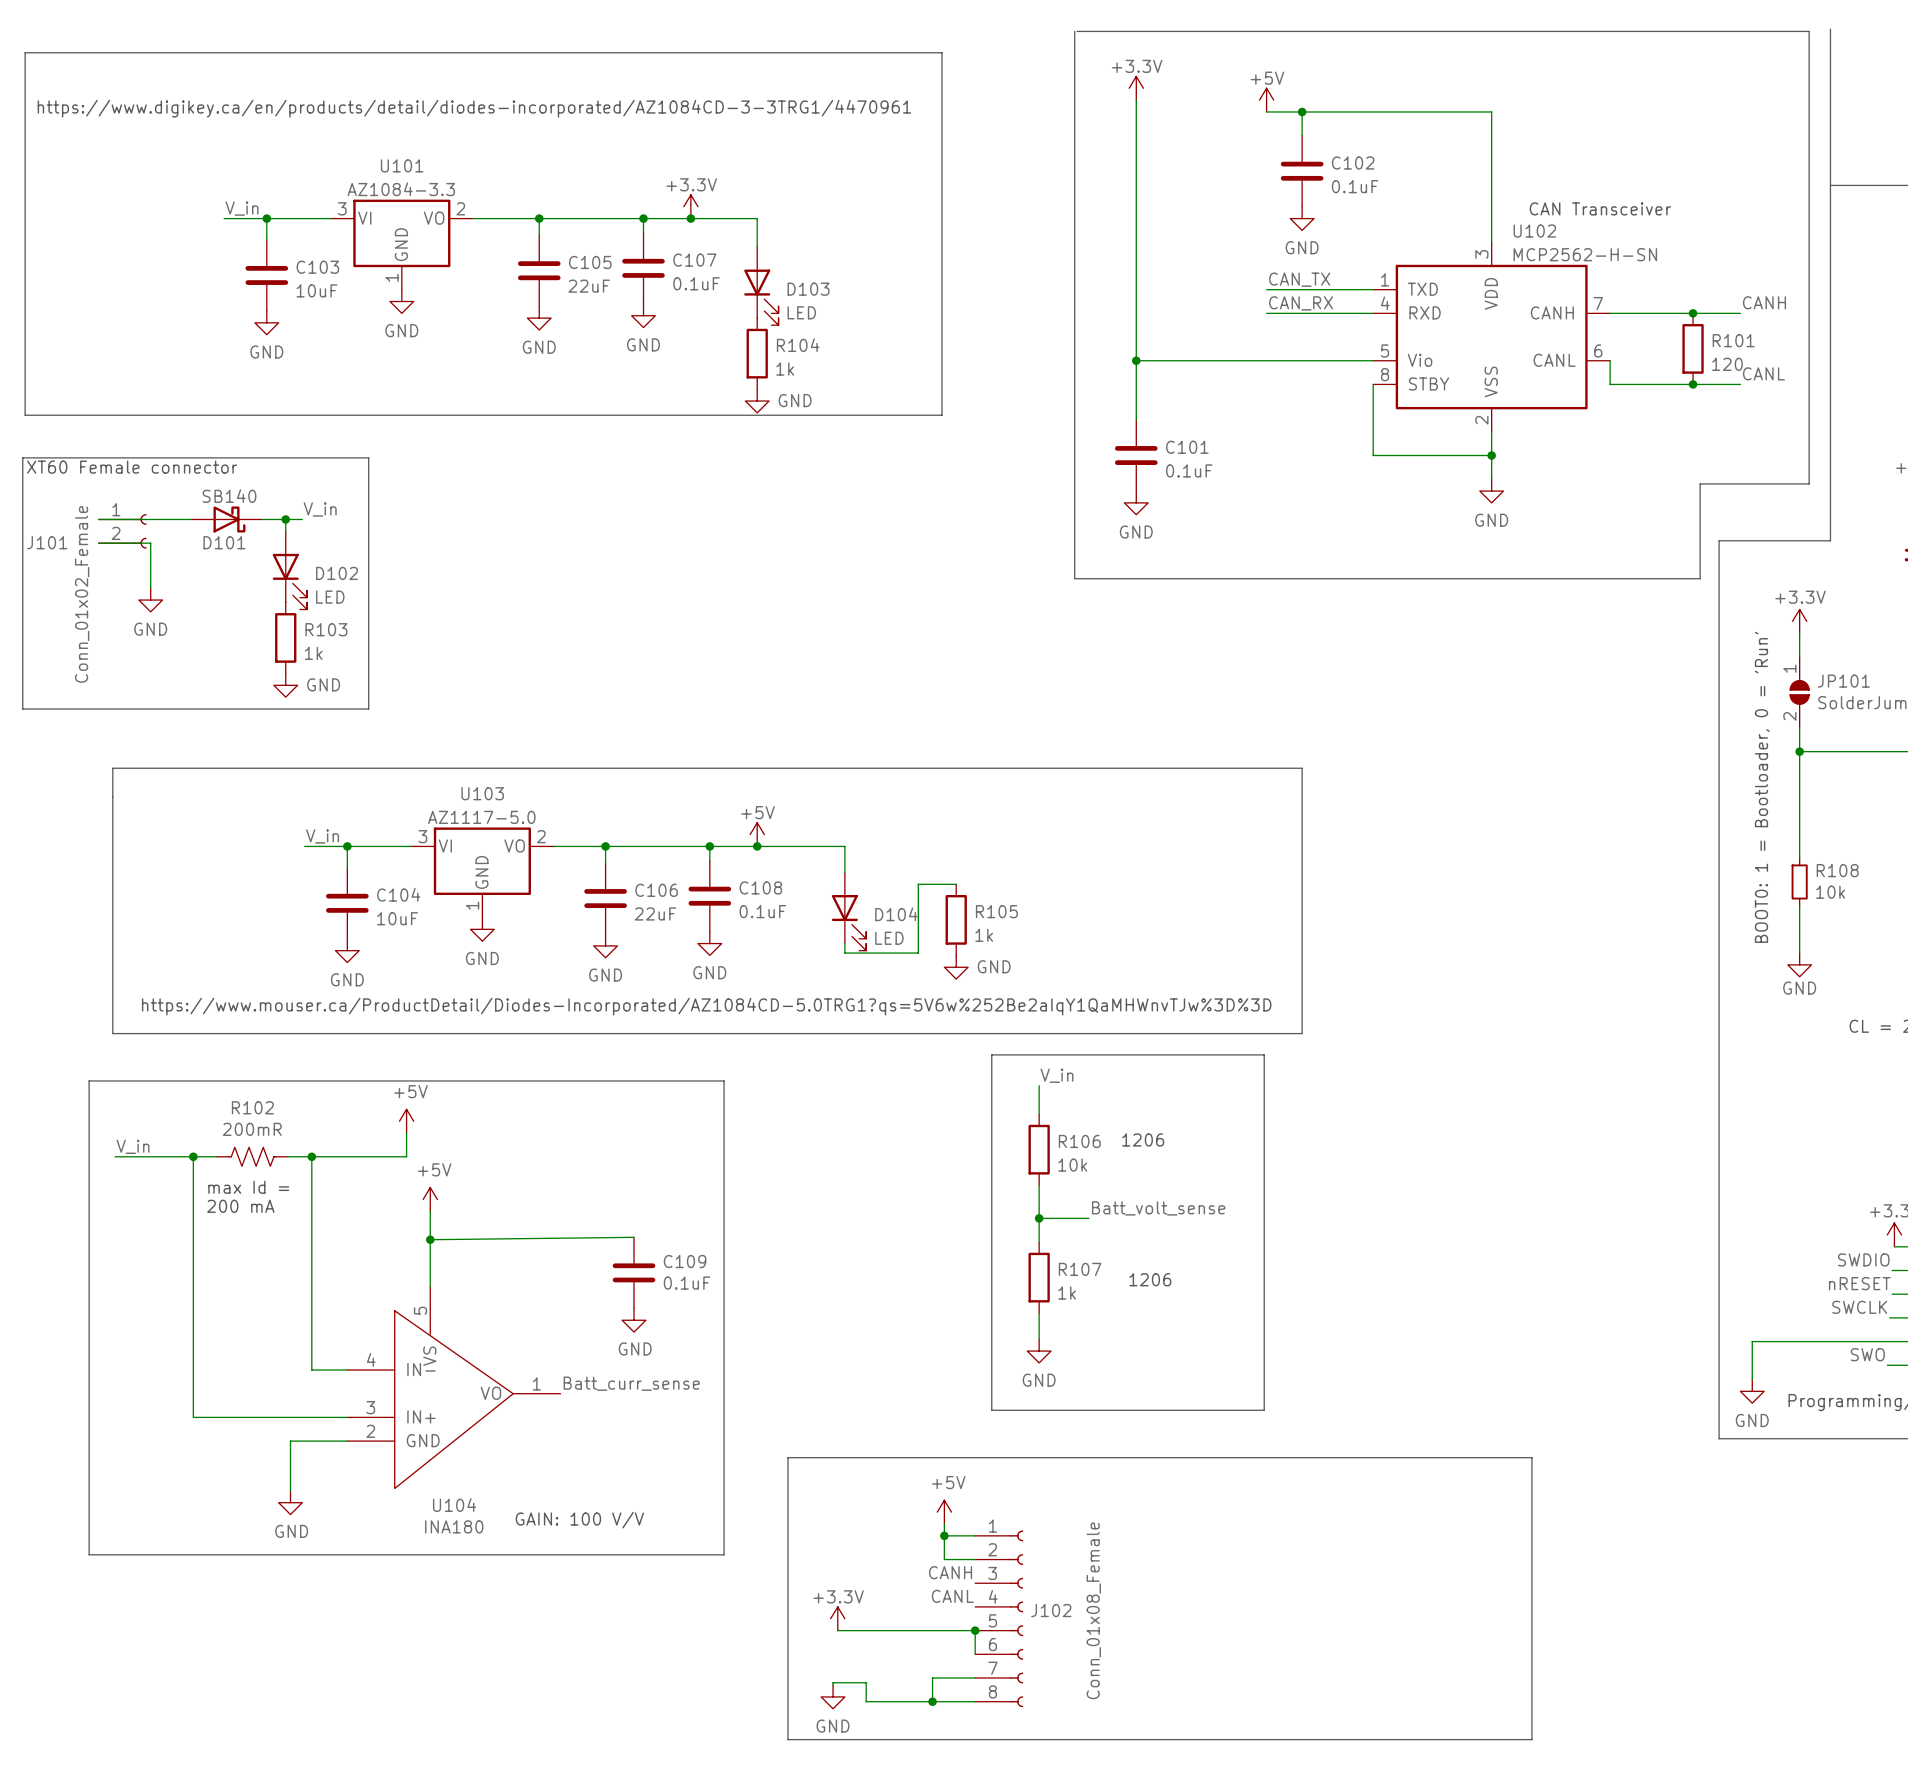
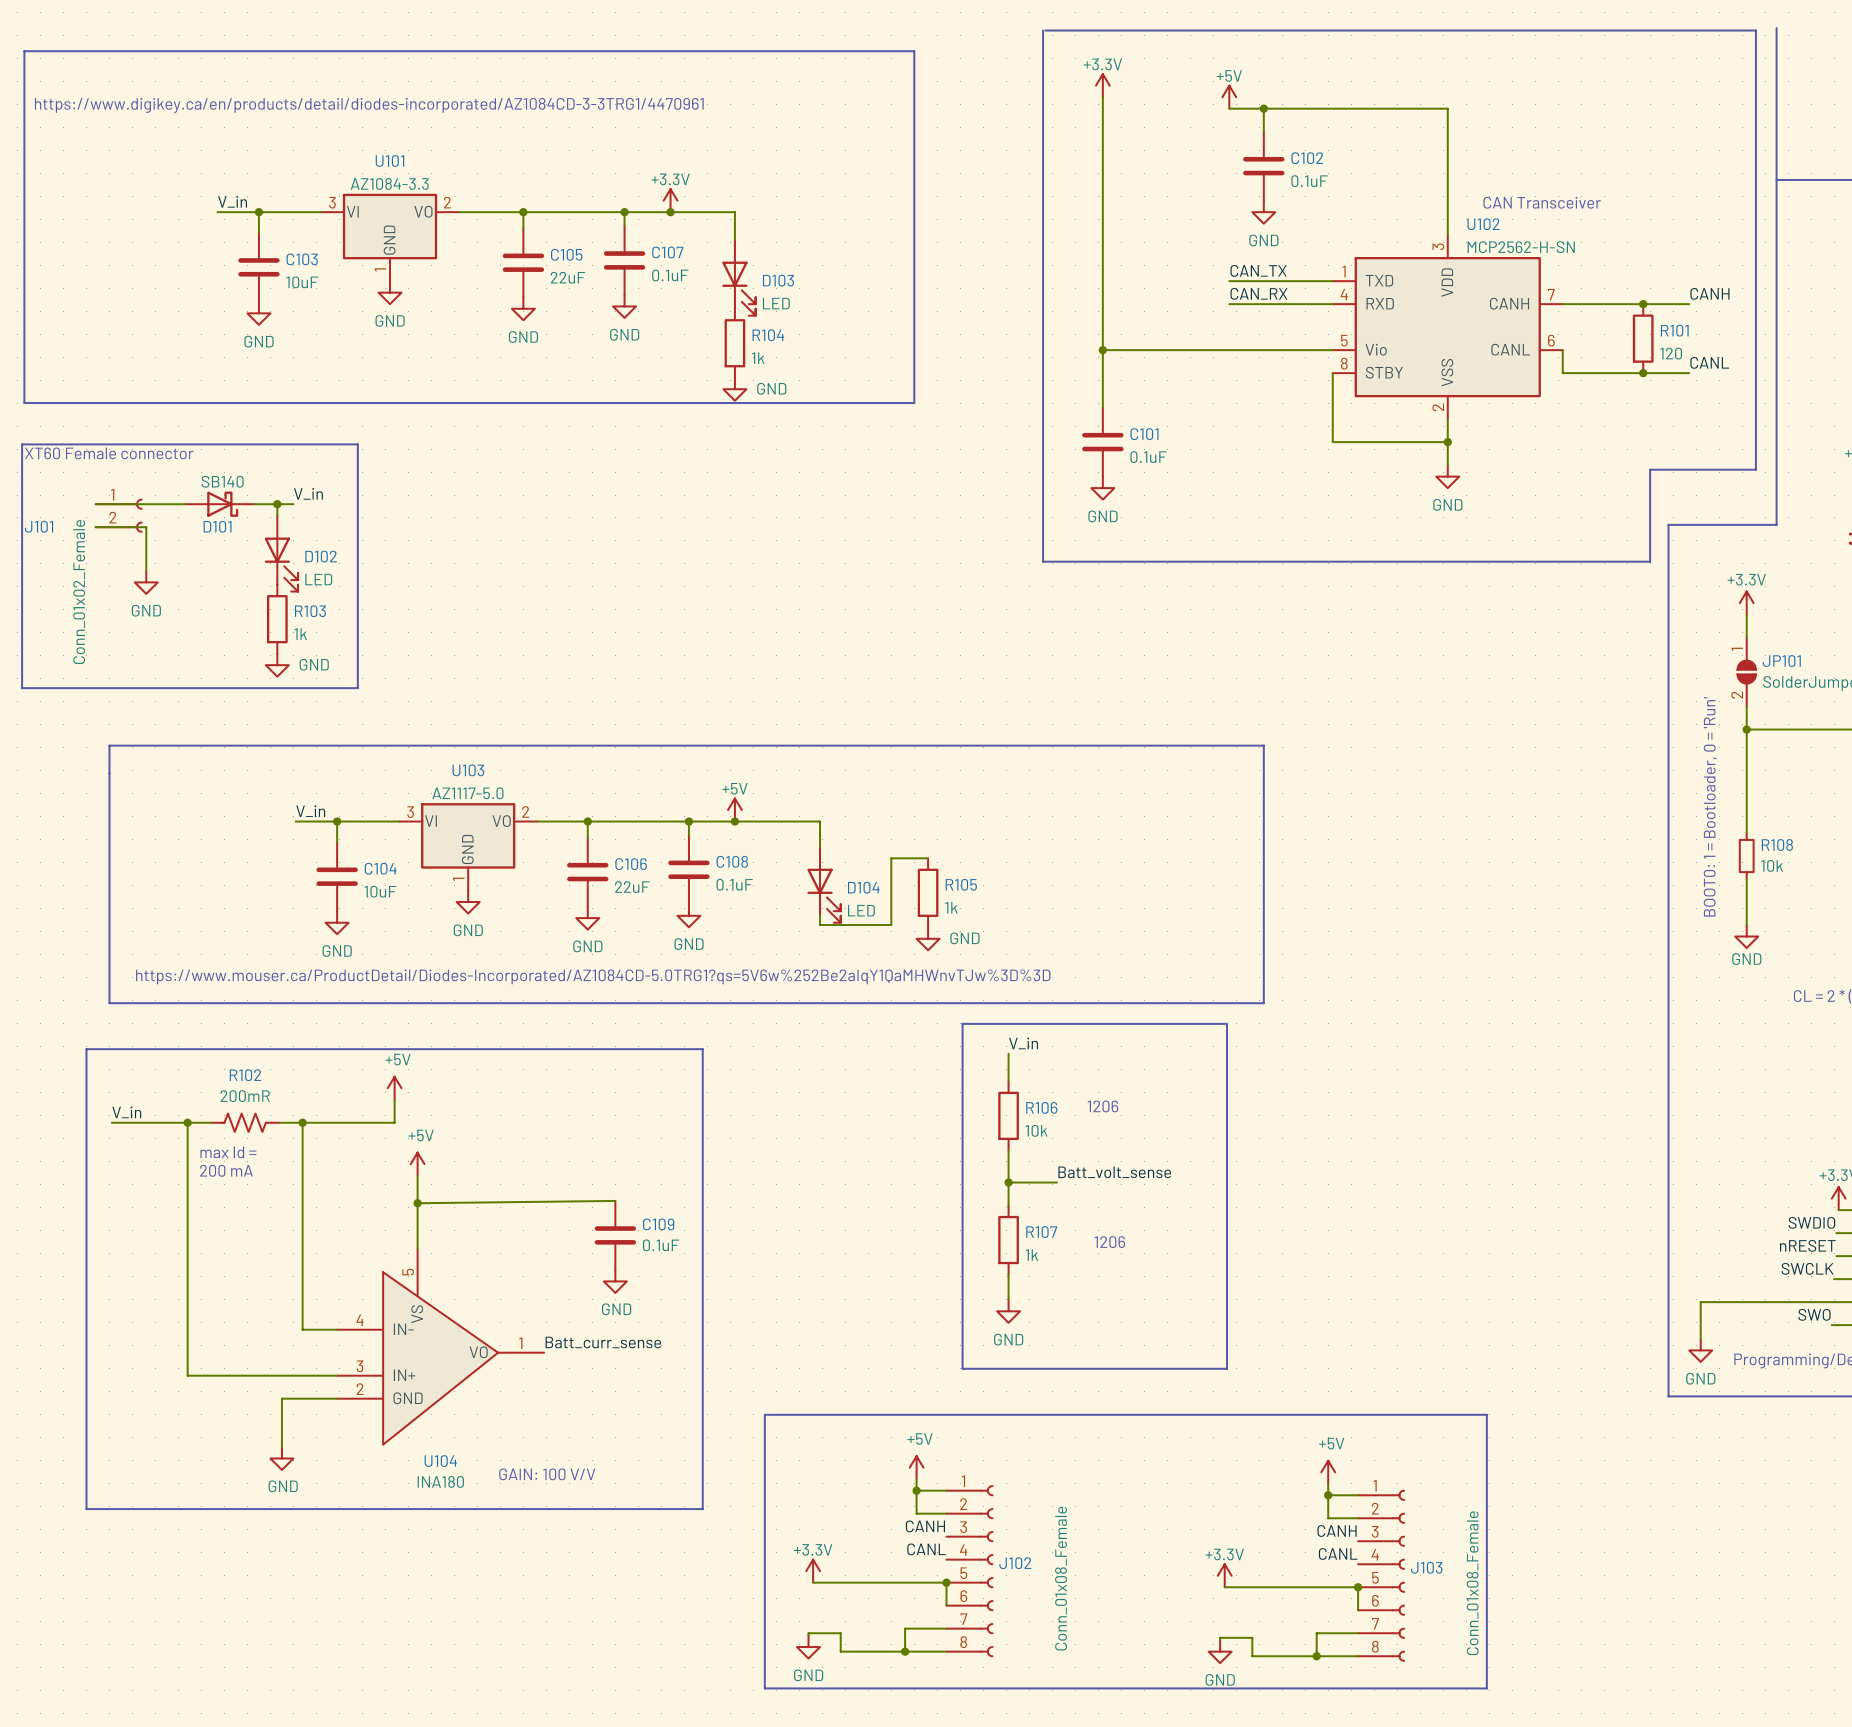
power symbol: none -> +5V (1328, 1472)
wire: none -> (1328, 1483) (1328, 1518) (1358, 1518)
wire: none -> (1328, 1495) (1358, 1495)
junction: none -> (1328, 1495)
label: none -> CANH (1337, 1531)
label: none -> CANL (1338, 1554)
power symbol: none -> +3.3V (1224, 1575)
J103: none -> Conn_01x08_Female (1381, 1575)
wire: none -> (1224, 1587) (1358, 1587) (1358, 1610)
junction: none -> (1358, 1587)
wire: none -> (1358, 1633) (1316, 1633) (1316, 1656)
wire: none -> (1220, 1640) (1220, 1637) (1252, 1637) (1252, 1656) (1358, 1656)
power symbol: none -> GND (1220, 1651)
junction: none -> (1316, 1656)

